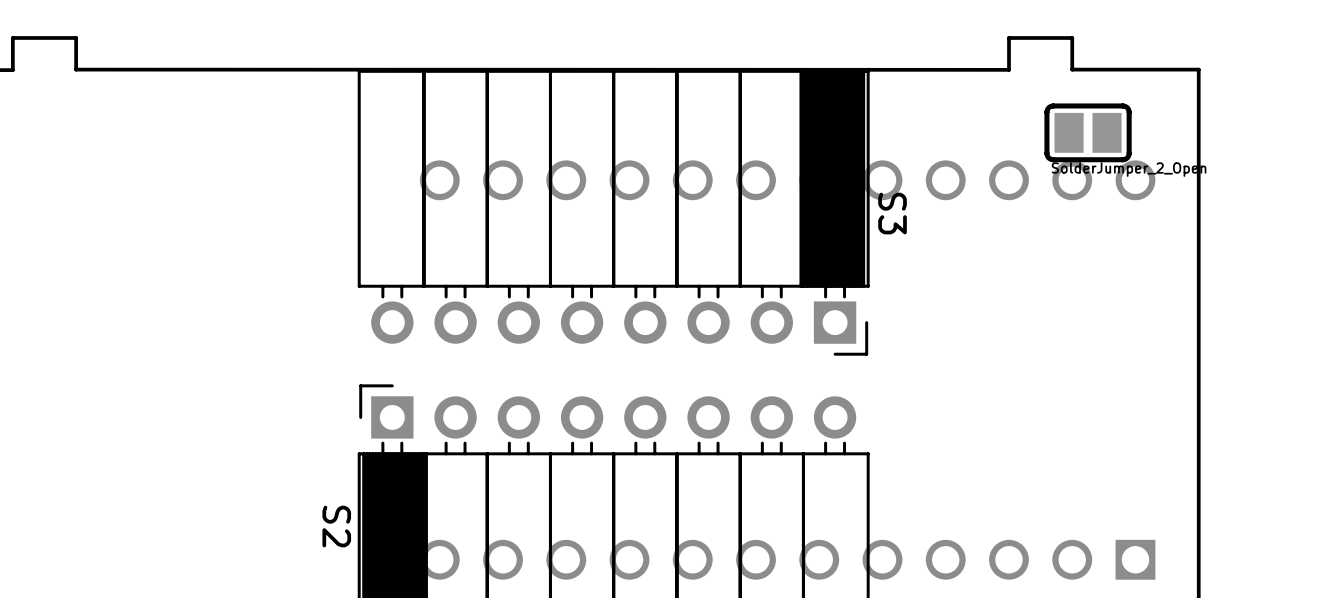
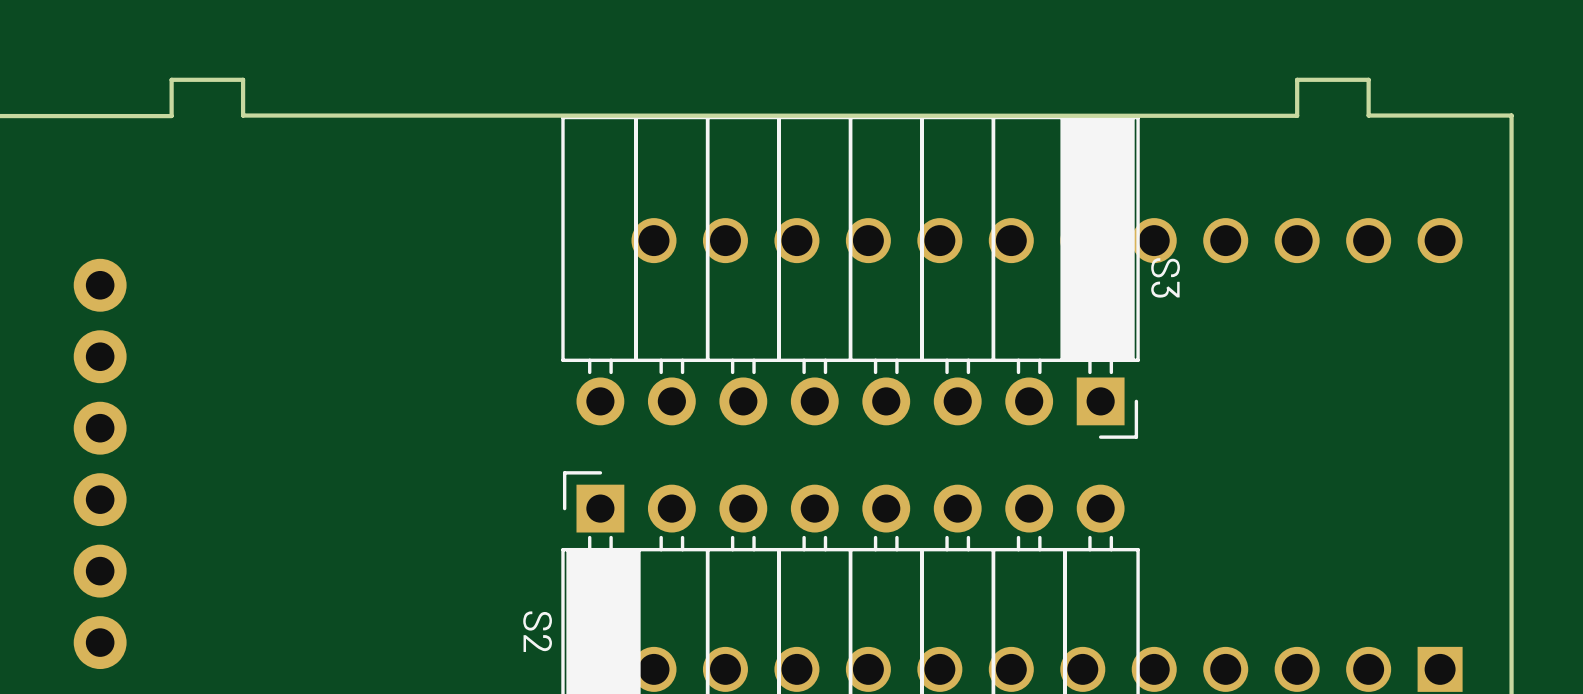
part: SolderJumper_2_Open (1088, 132) -> none

